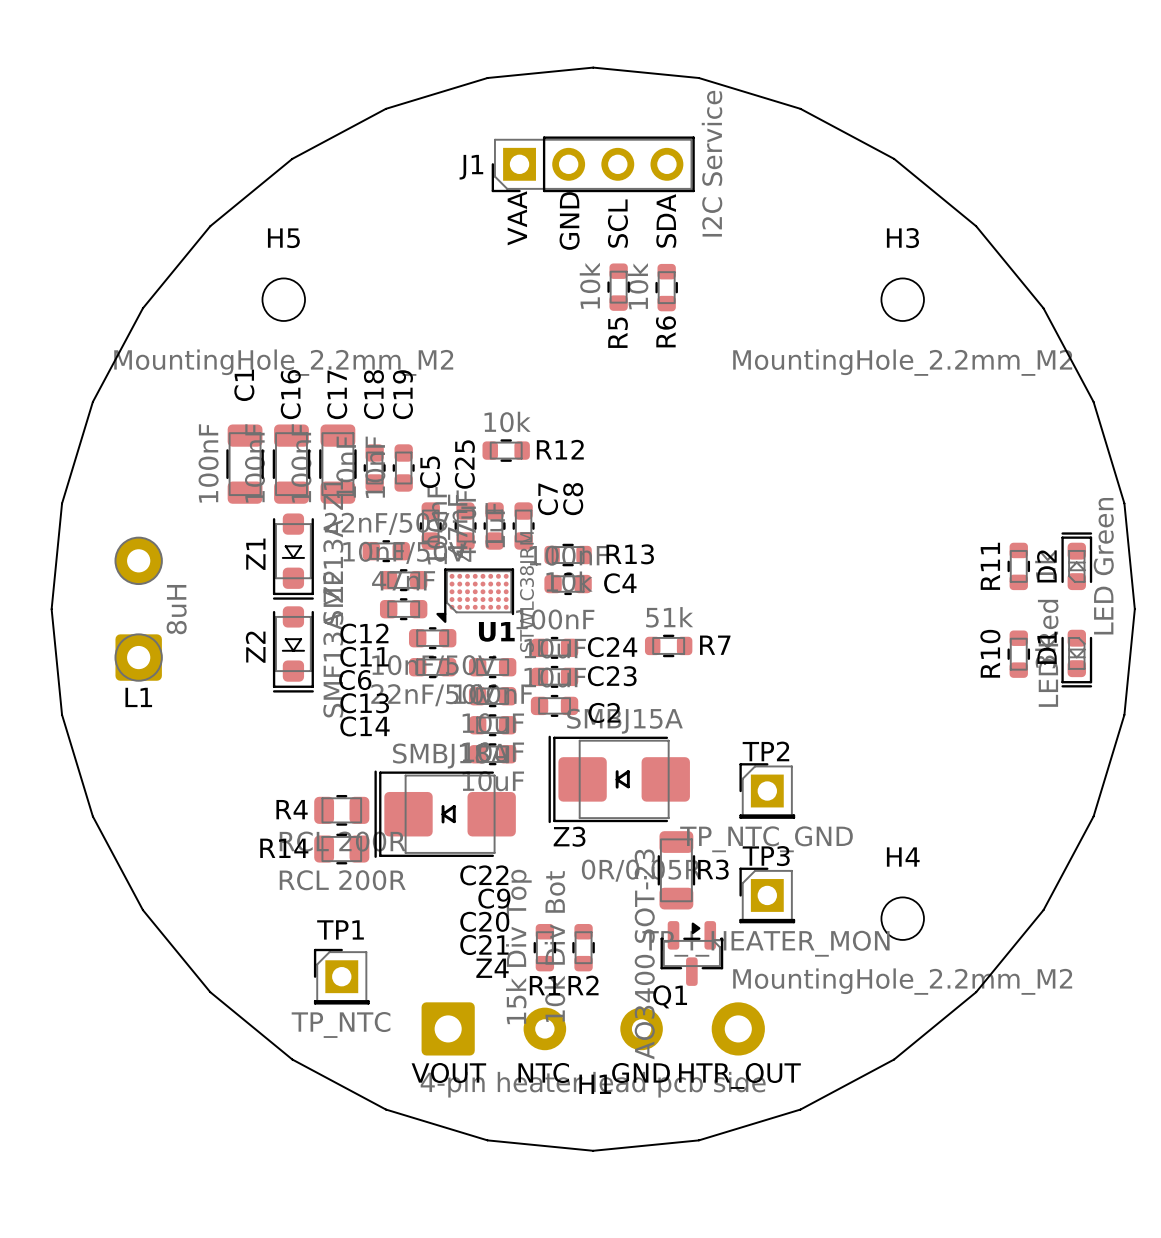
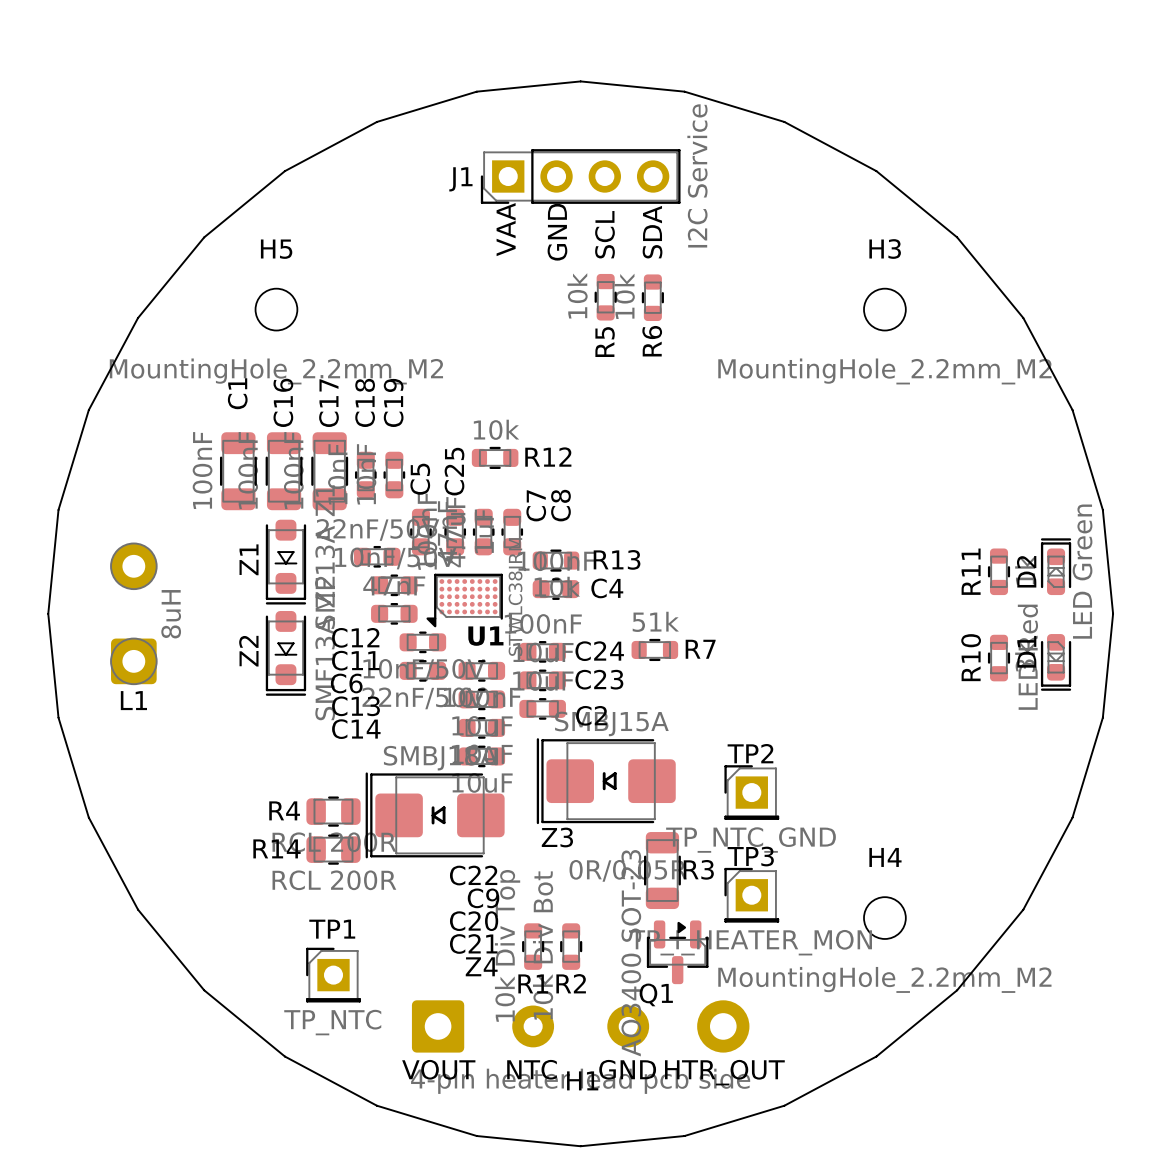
R1 value: 15k Div Top (518, 946) -> 10k Div Top (507, 945)

